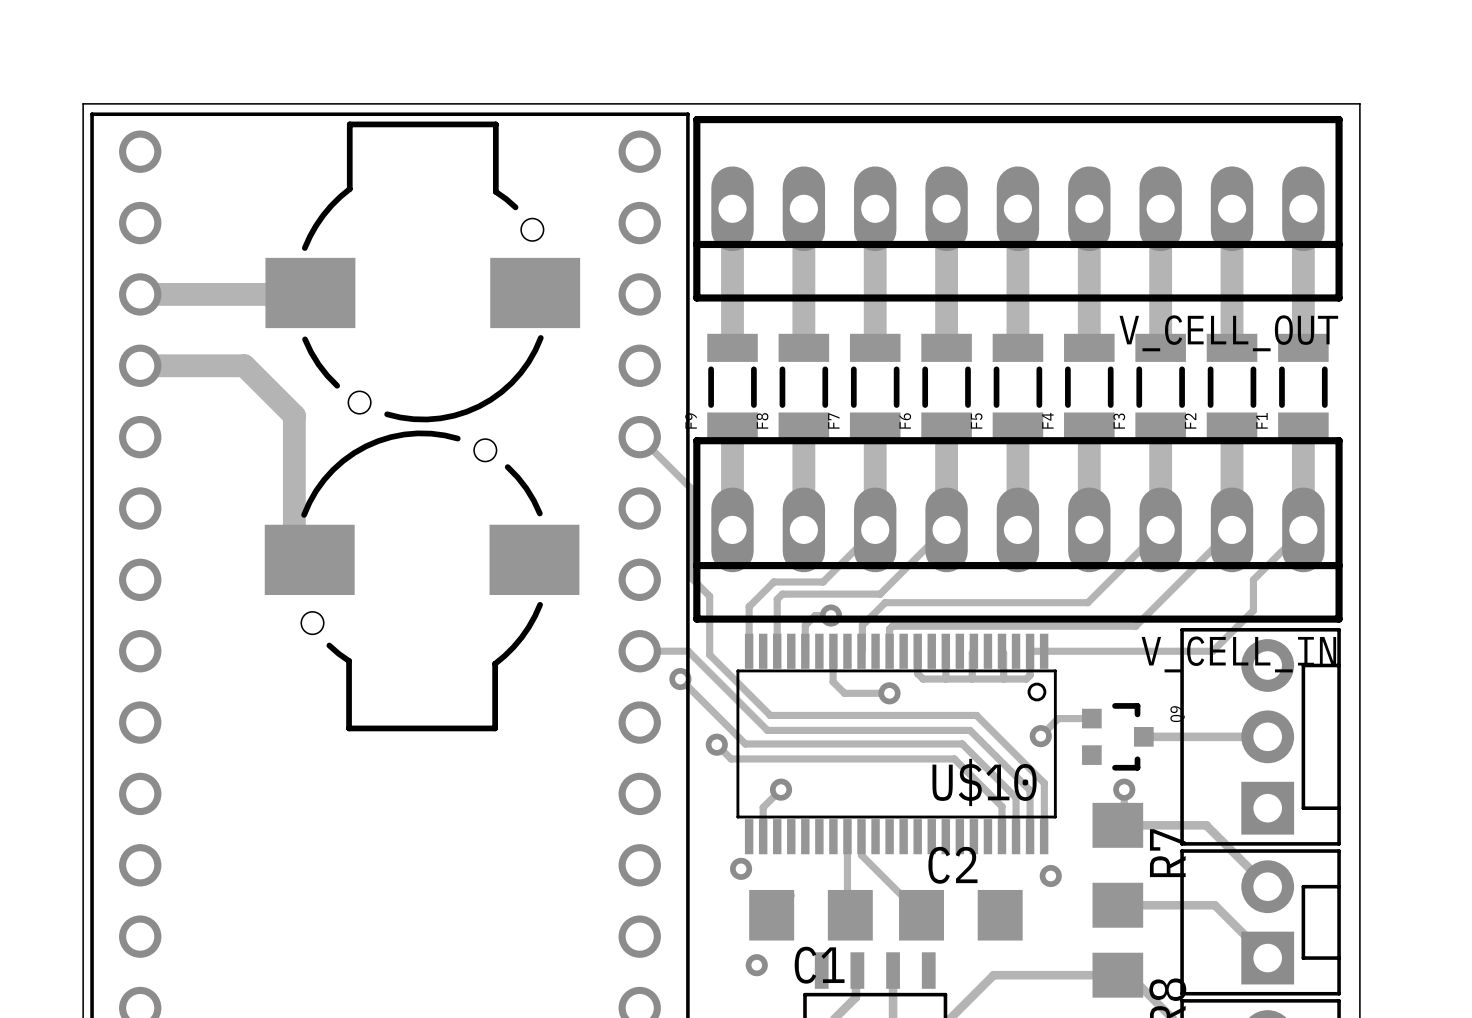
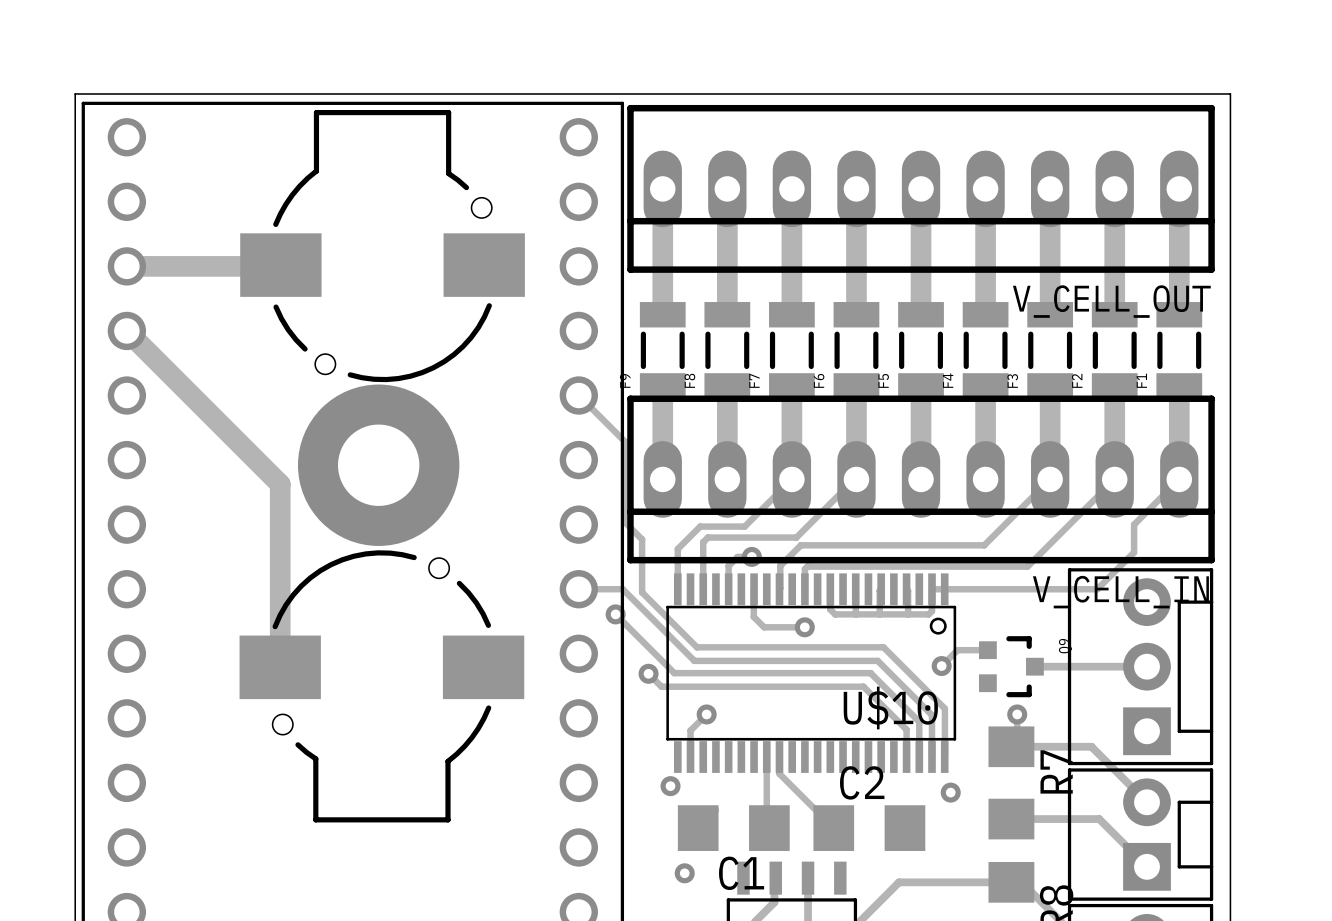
track: (140, 365) (244, 365) (294, 415) (294, 544) (309, 559) -> (126, 330) (280, 484) (280, 667)
part: none -> (378, 465)
part position: (422, 580) -> (381, 686)

